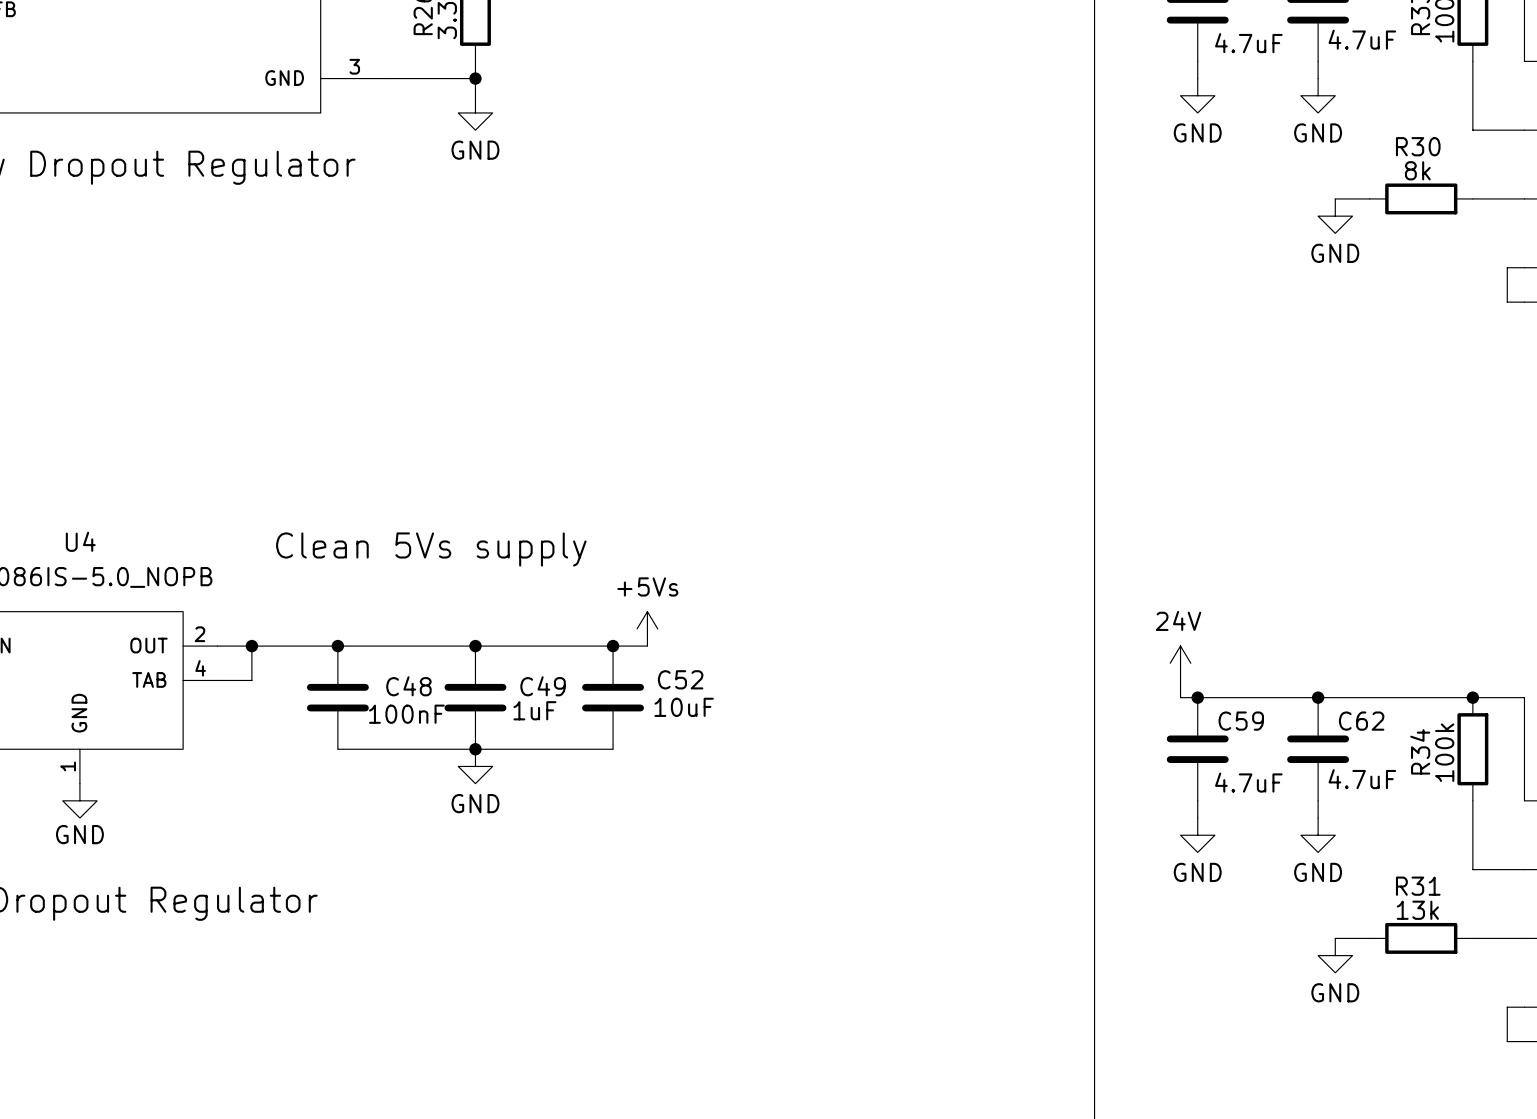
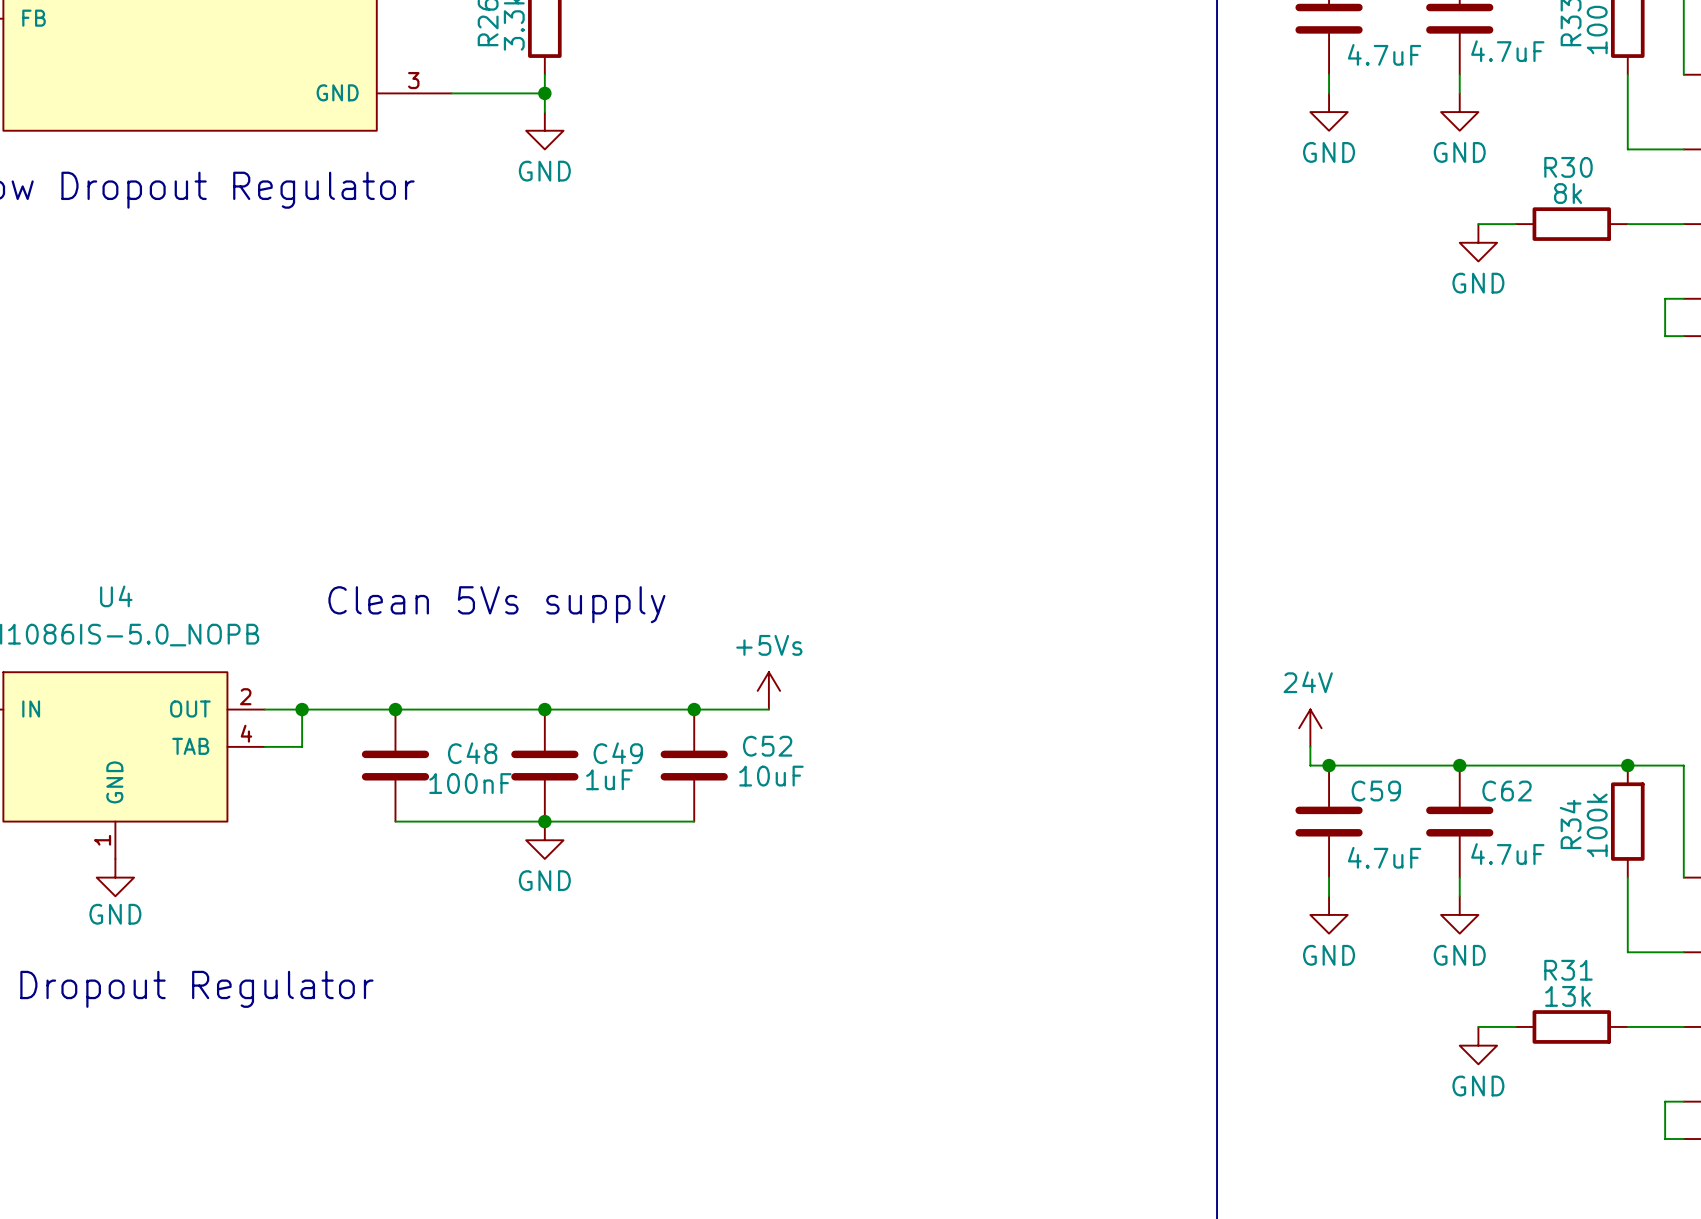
power symbol position: +5Vs (647, 628) -> +5Vs (768, 690)
wire: none -> (731, 709) (768, 709)

